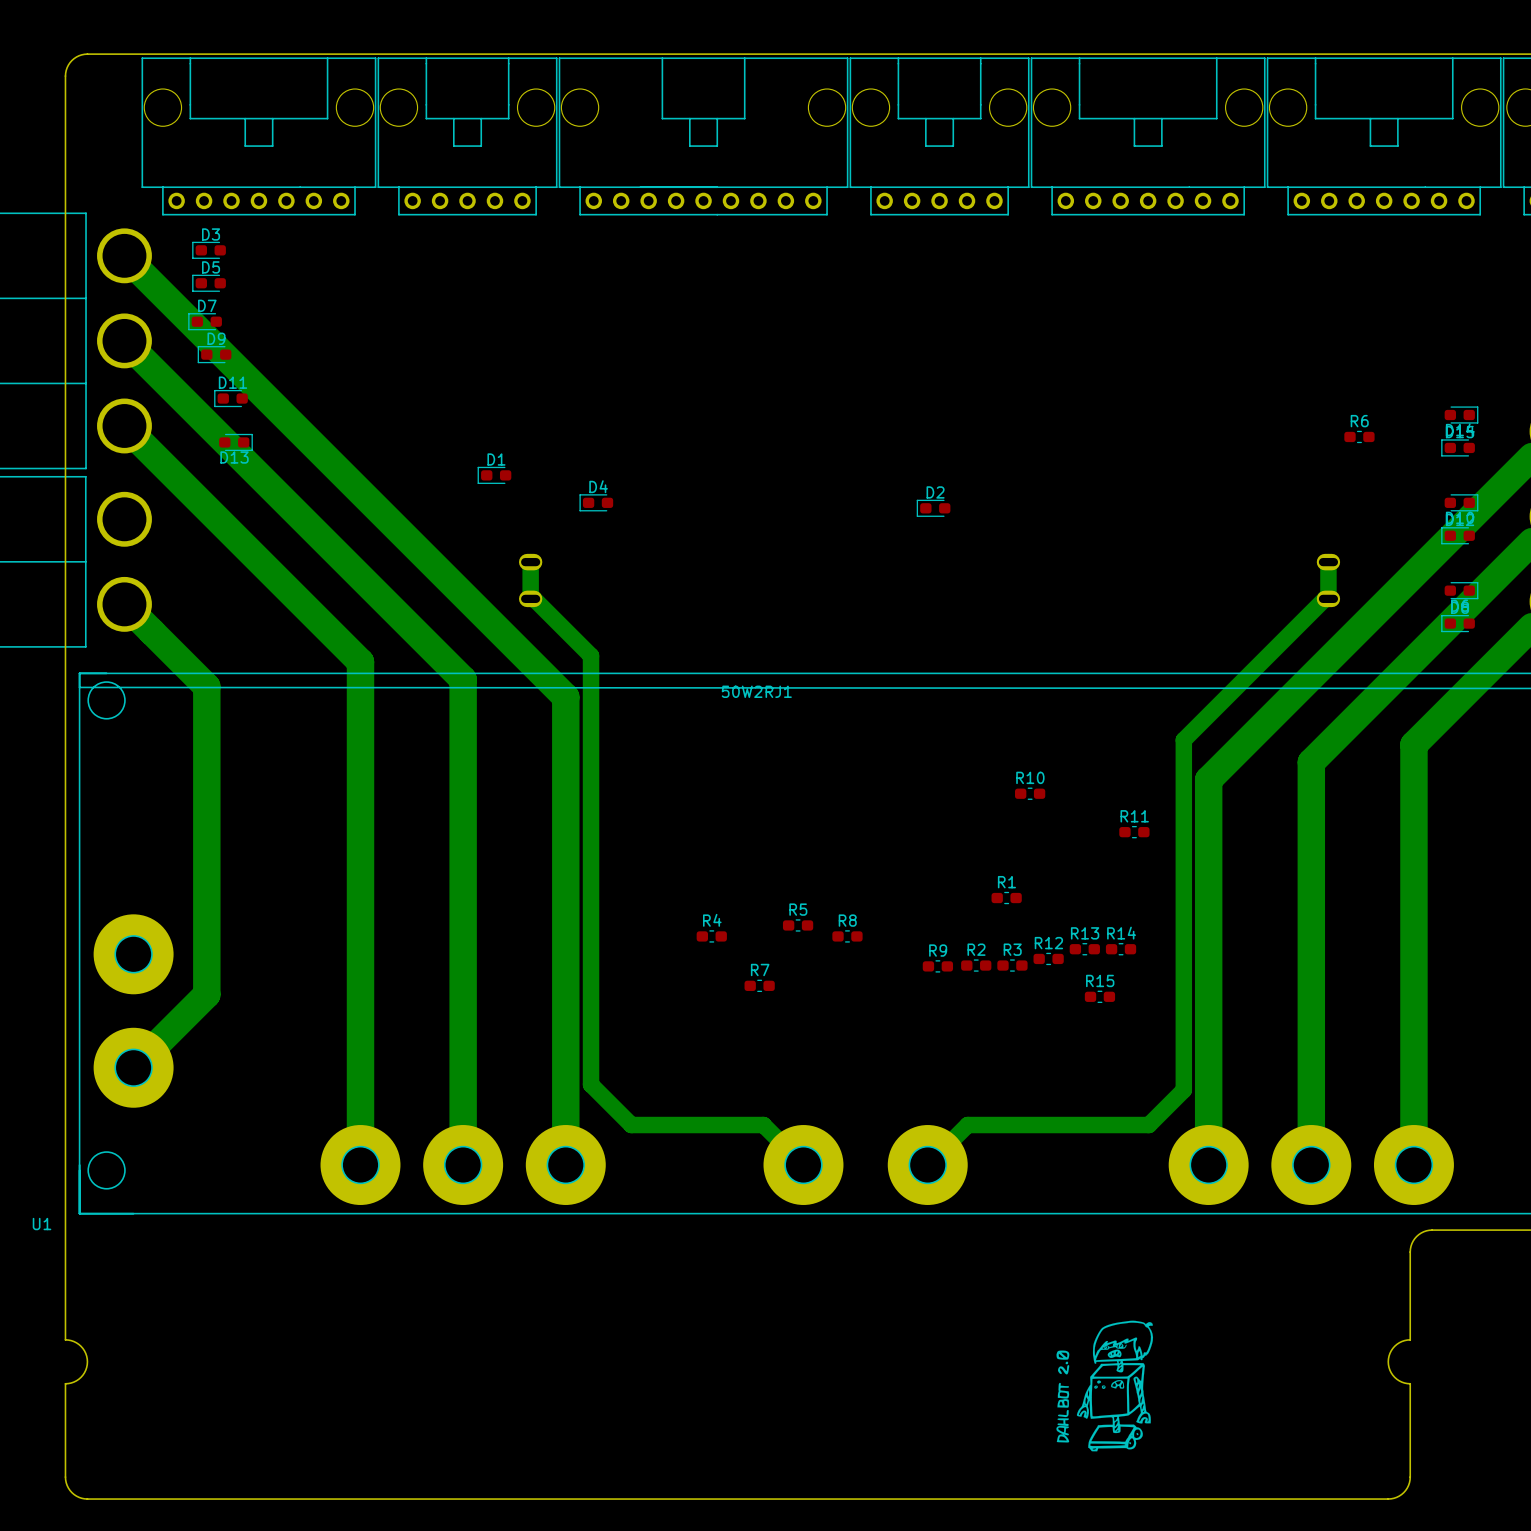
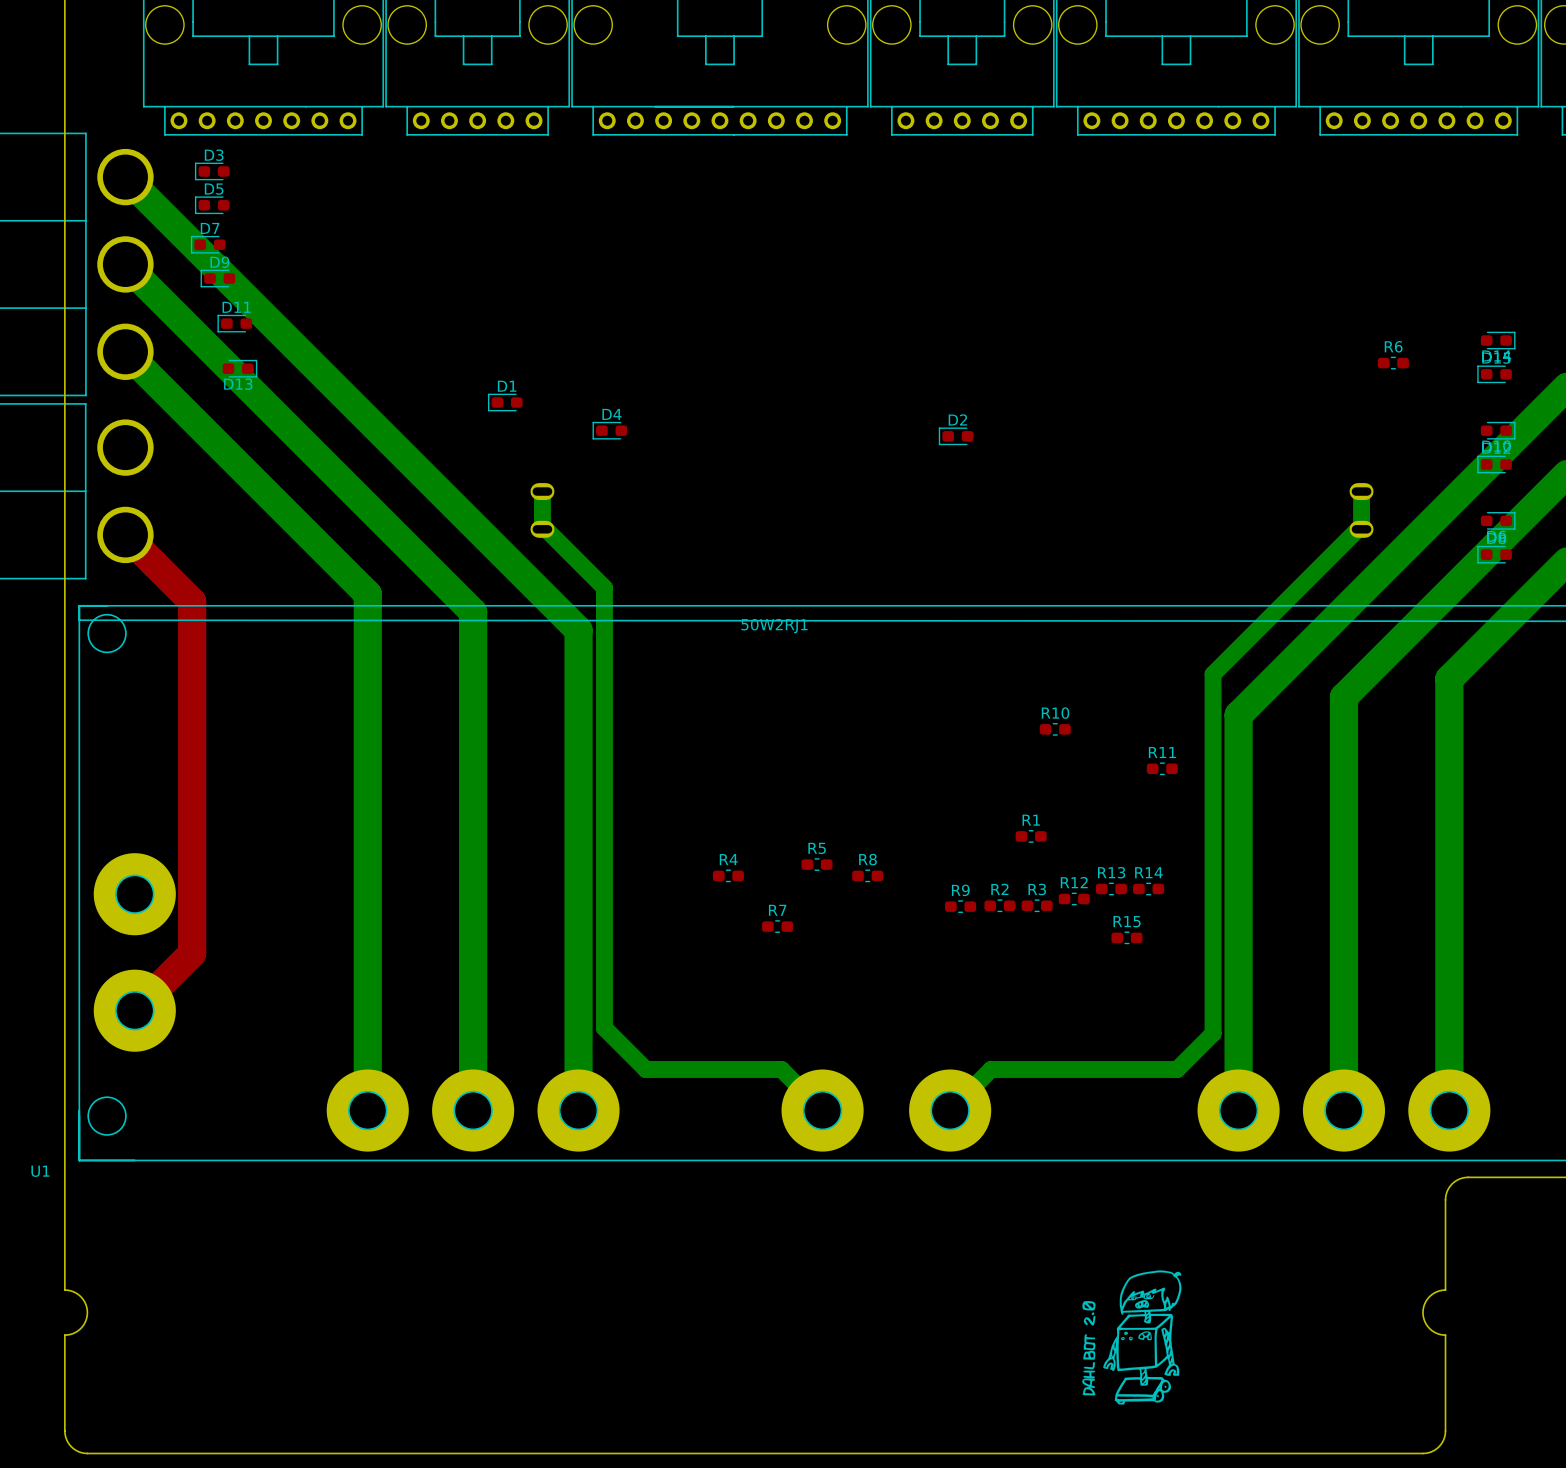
bottom track: (124, 604) (206, 686) (206, 994) (133, 1067) -> none
top track: none -> (125, 534) (192, 601) (192, 953) (134, 1010)

